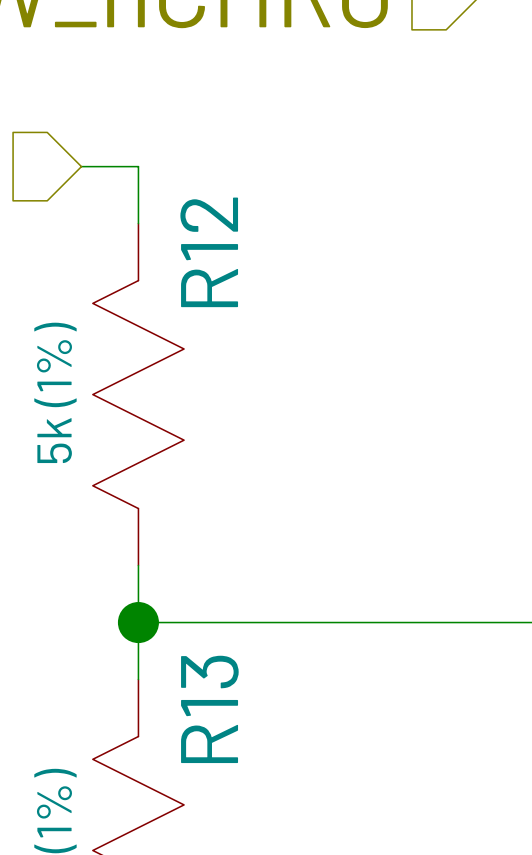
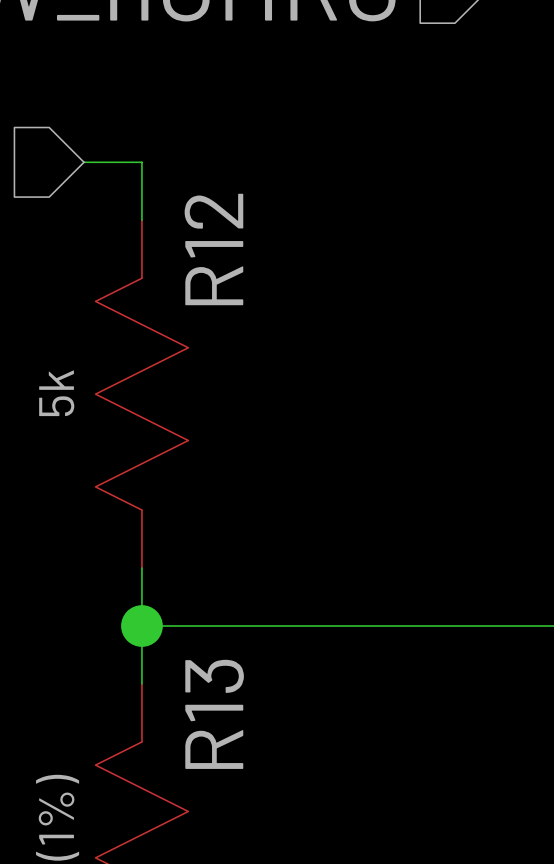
R12 value: 5k (1%) (55, 392) -> 5k (56, 393)

